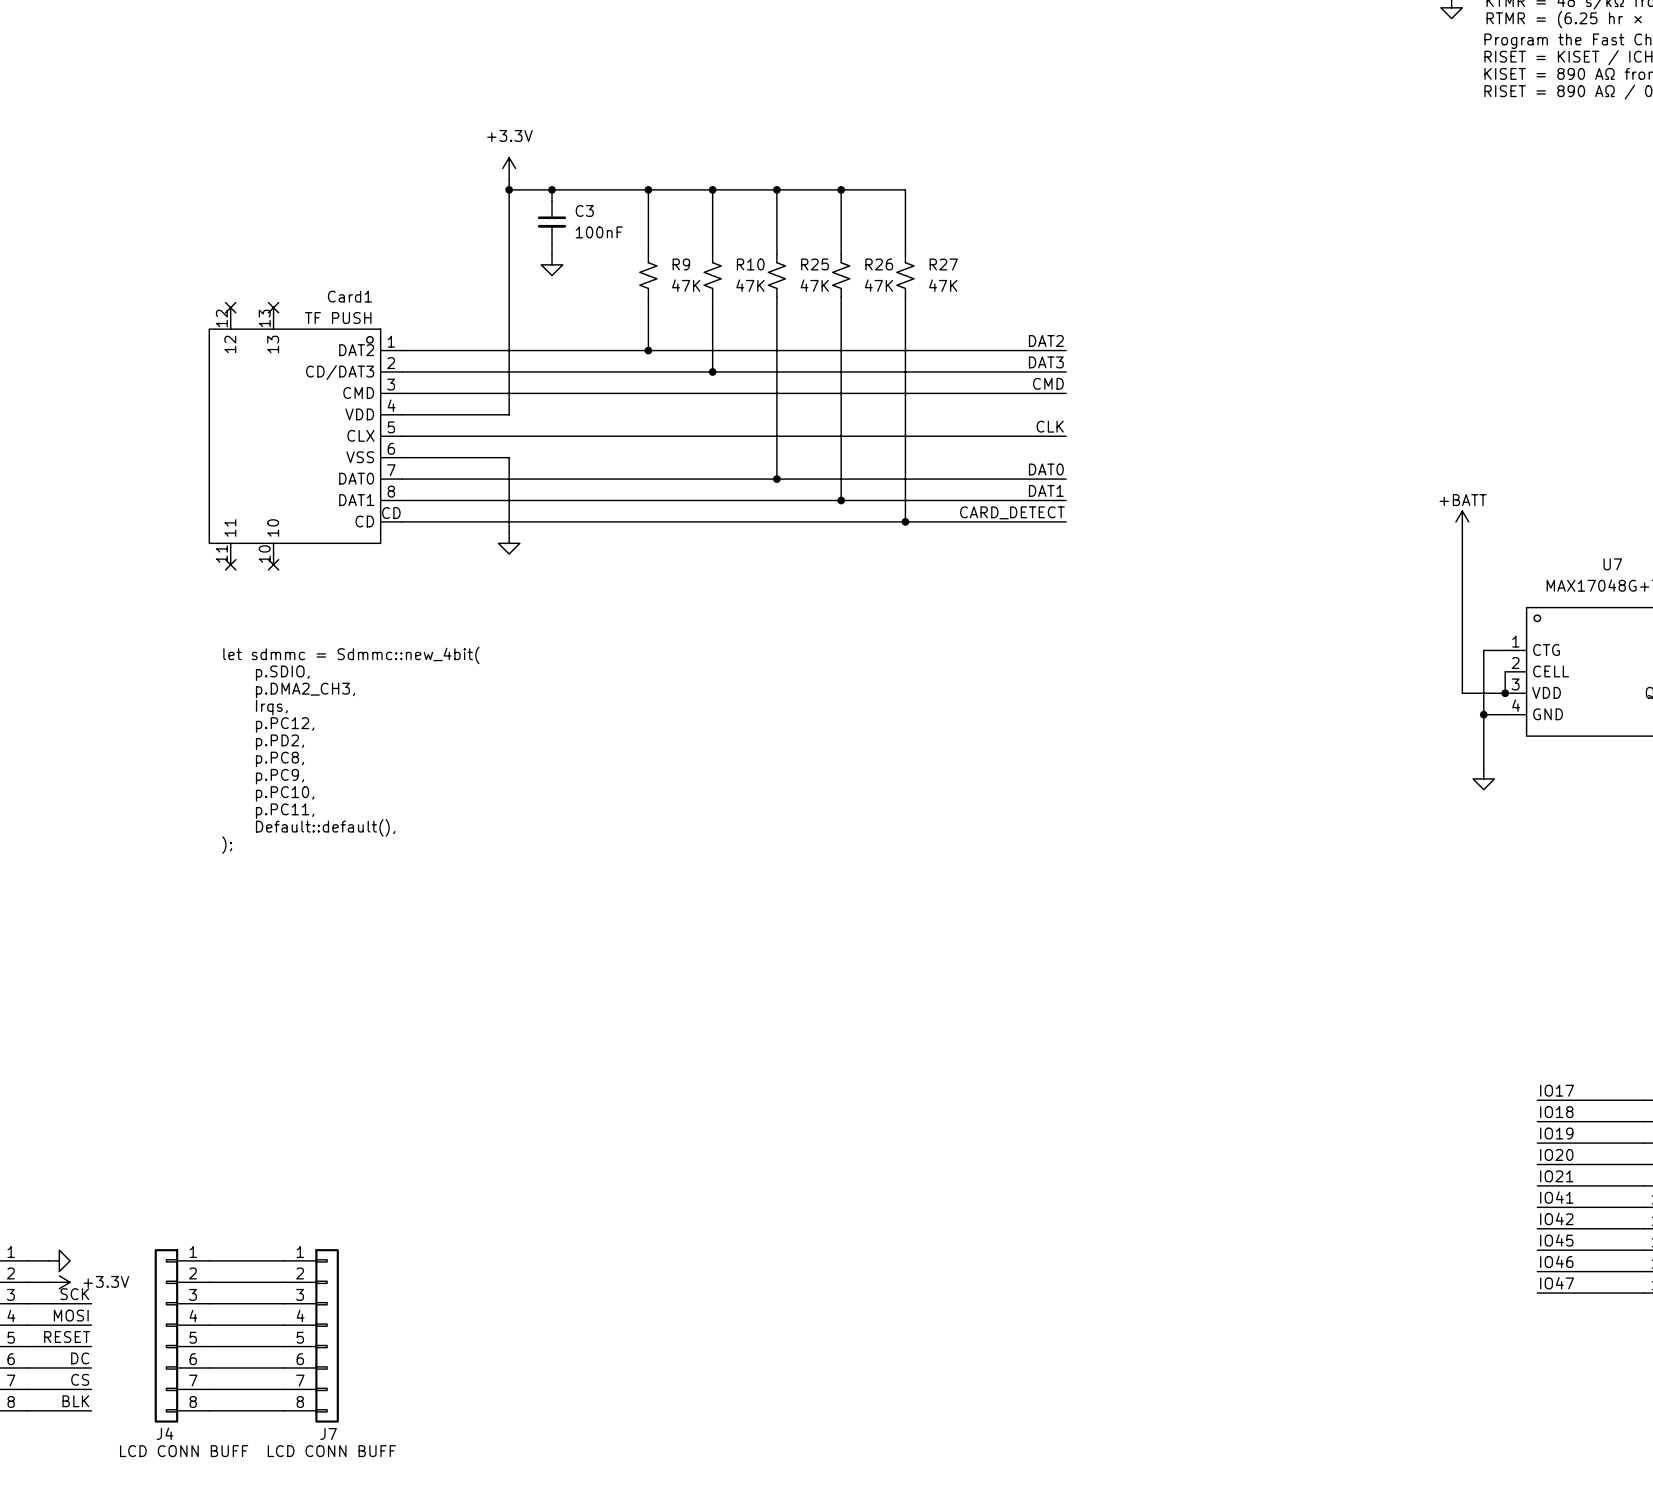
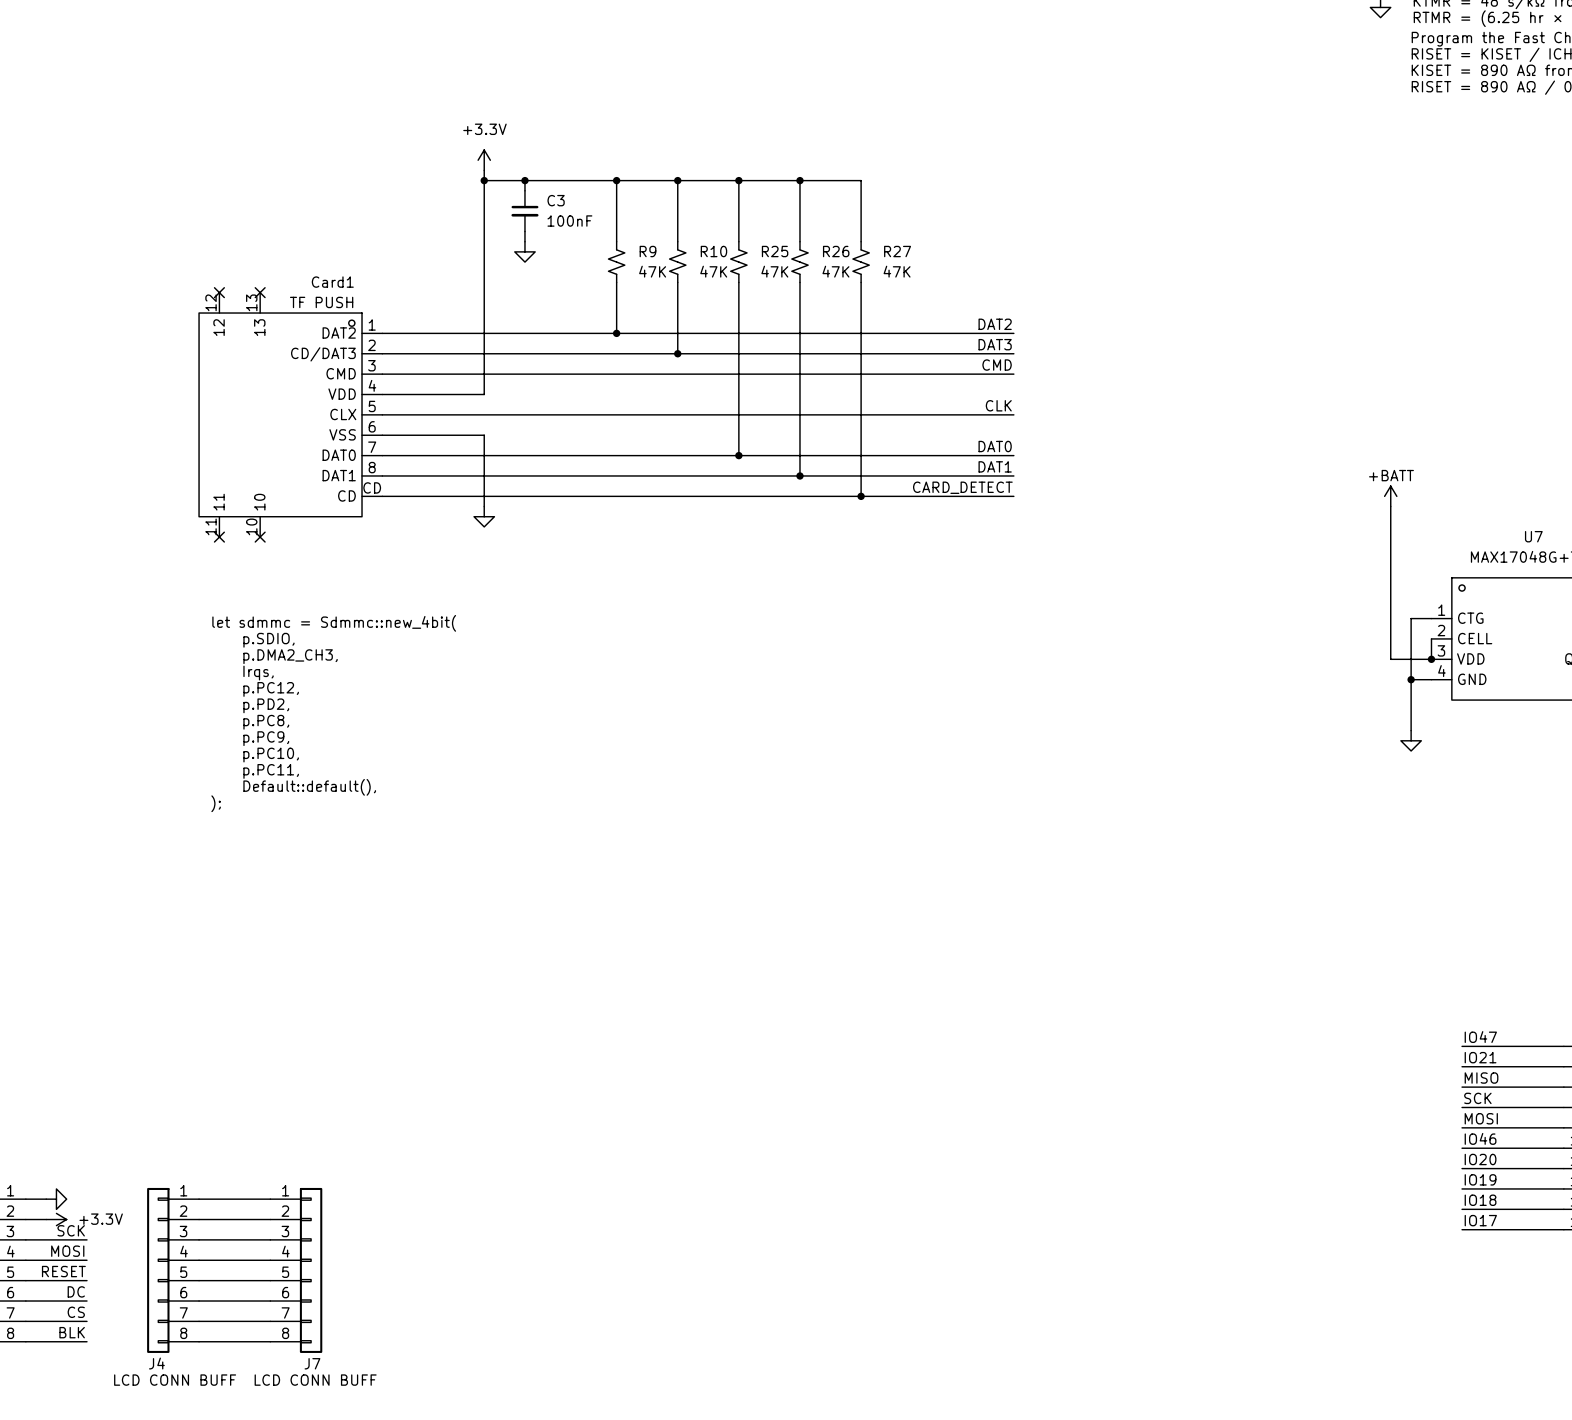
label: IO17 (1557, 1090) -> IO47 (1480, 1037)
label: IO18 (1556, 1112) -> IO21 (1480, 1057)
label: IO19 (1556, 1133) -> MISO (1481, 1078)
label: IO20 (1556, 1154) -> SCK (1477, 1098)
label: IO21 (1556, 1176) -> MOSI (1481, 1118)
label: IO41 (1556, 1197) -> IO46 (1480, 1138)
label: IO42 (1556, 1218) -> IO20 (1480, 1159)
label: IO45 (1556, 1240) -> IO19 (1480, 1179)
label: IO46 (1556, 1261) -> IO18 (1480, 1200)
label: IO47 (1557, 1283) -> IO17 (1480, 1220)

